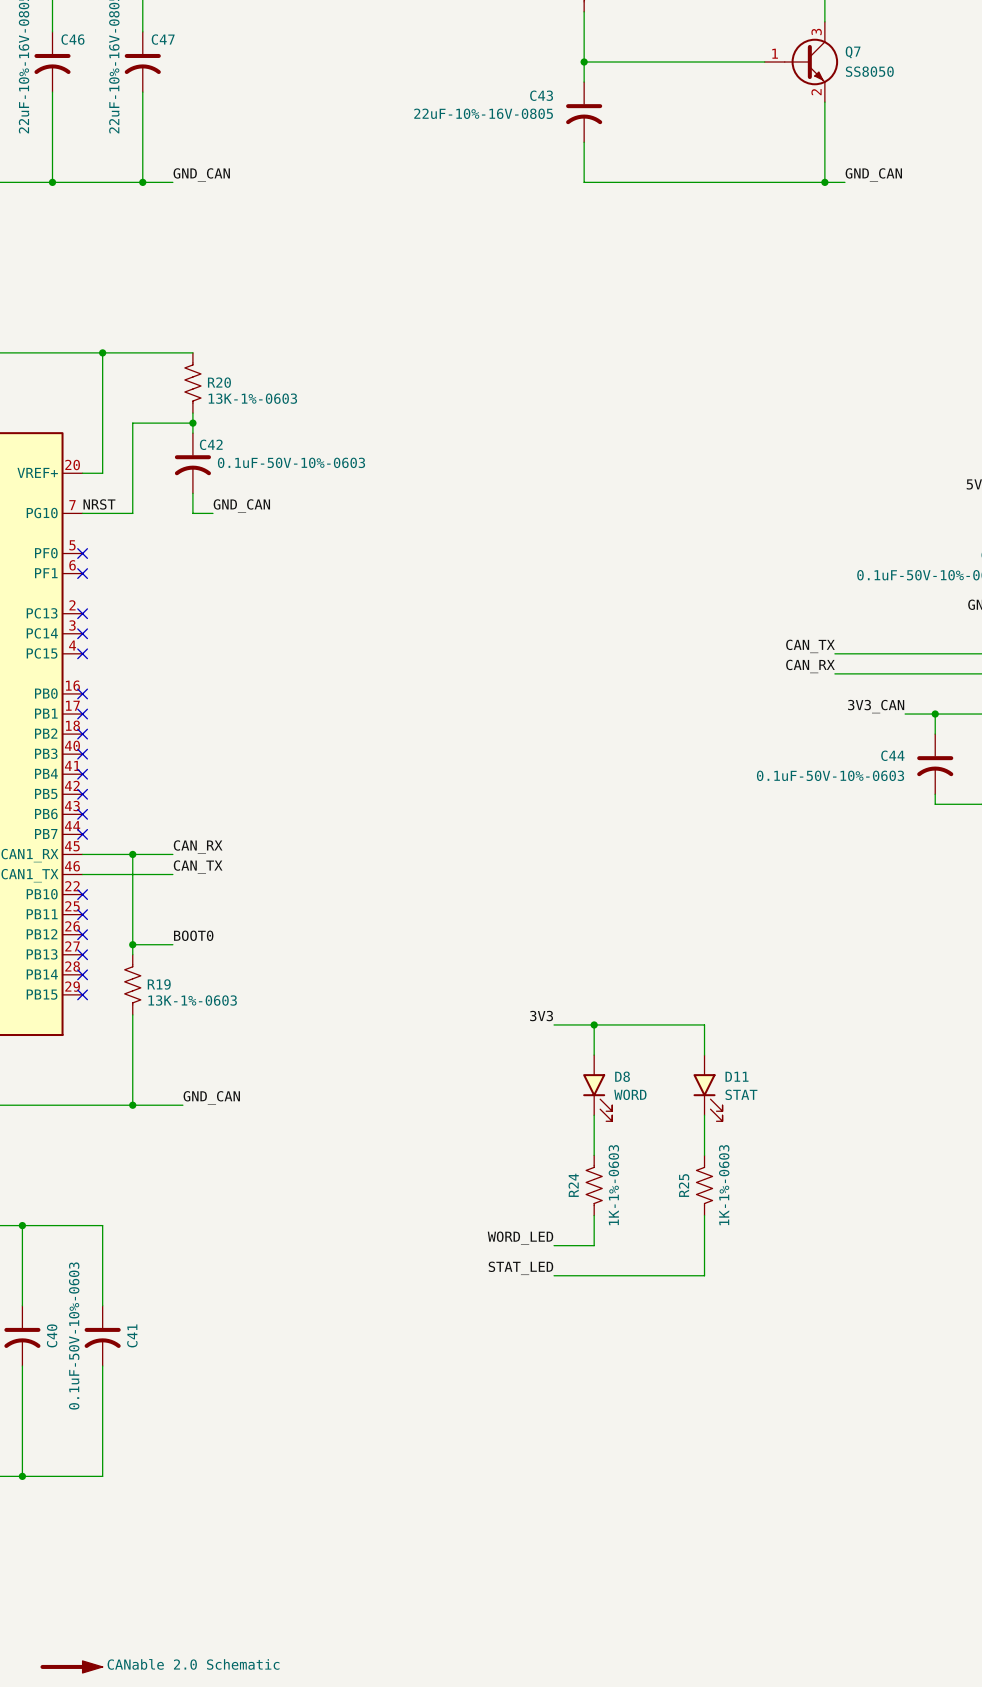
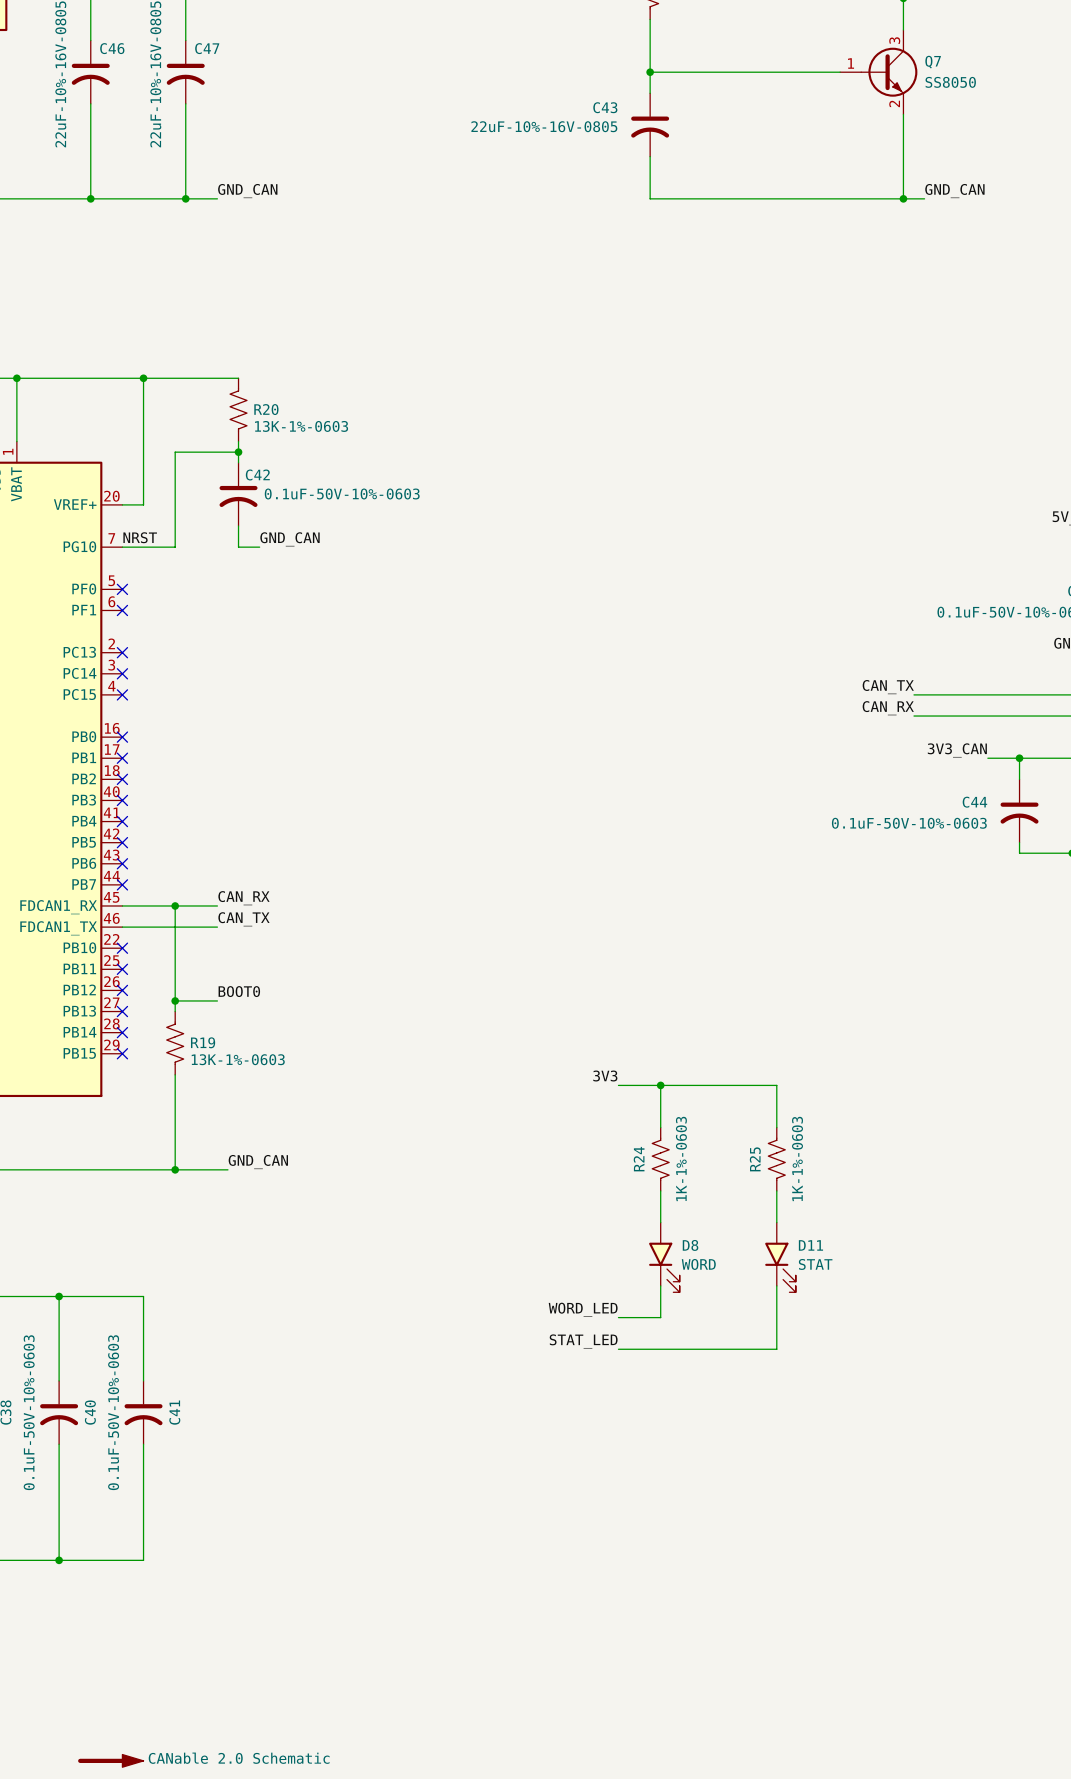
D8 position: (597, 1088) -> (664, 1257)
D11 position: (708, 1088) -> (780, 1257)
R24 position: (594, 1185) -> (660, 1159)
R25 position: (704, 1185) -> (776, 1159)

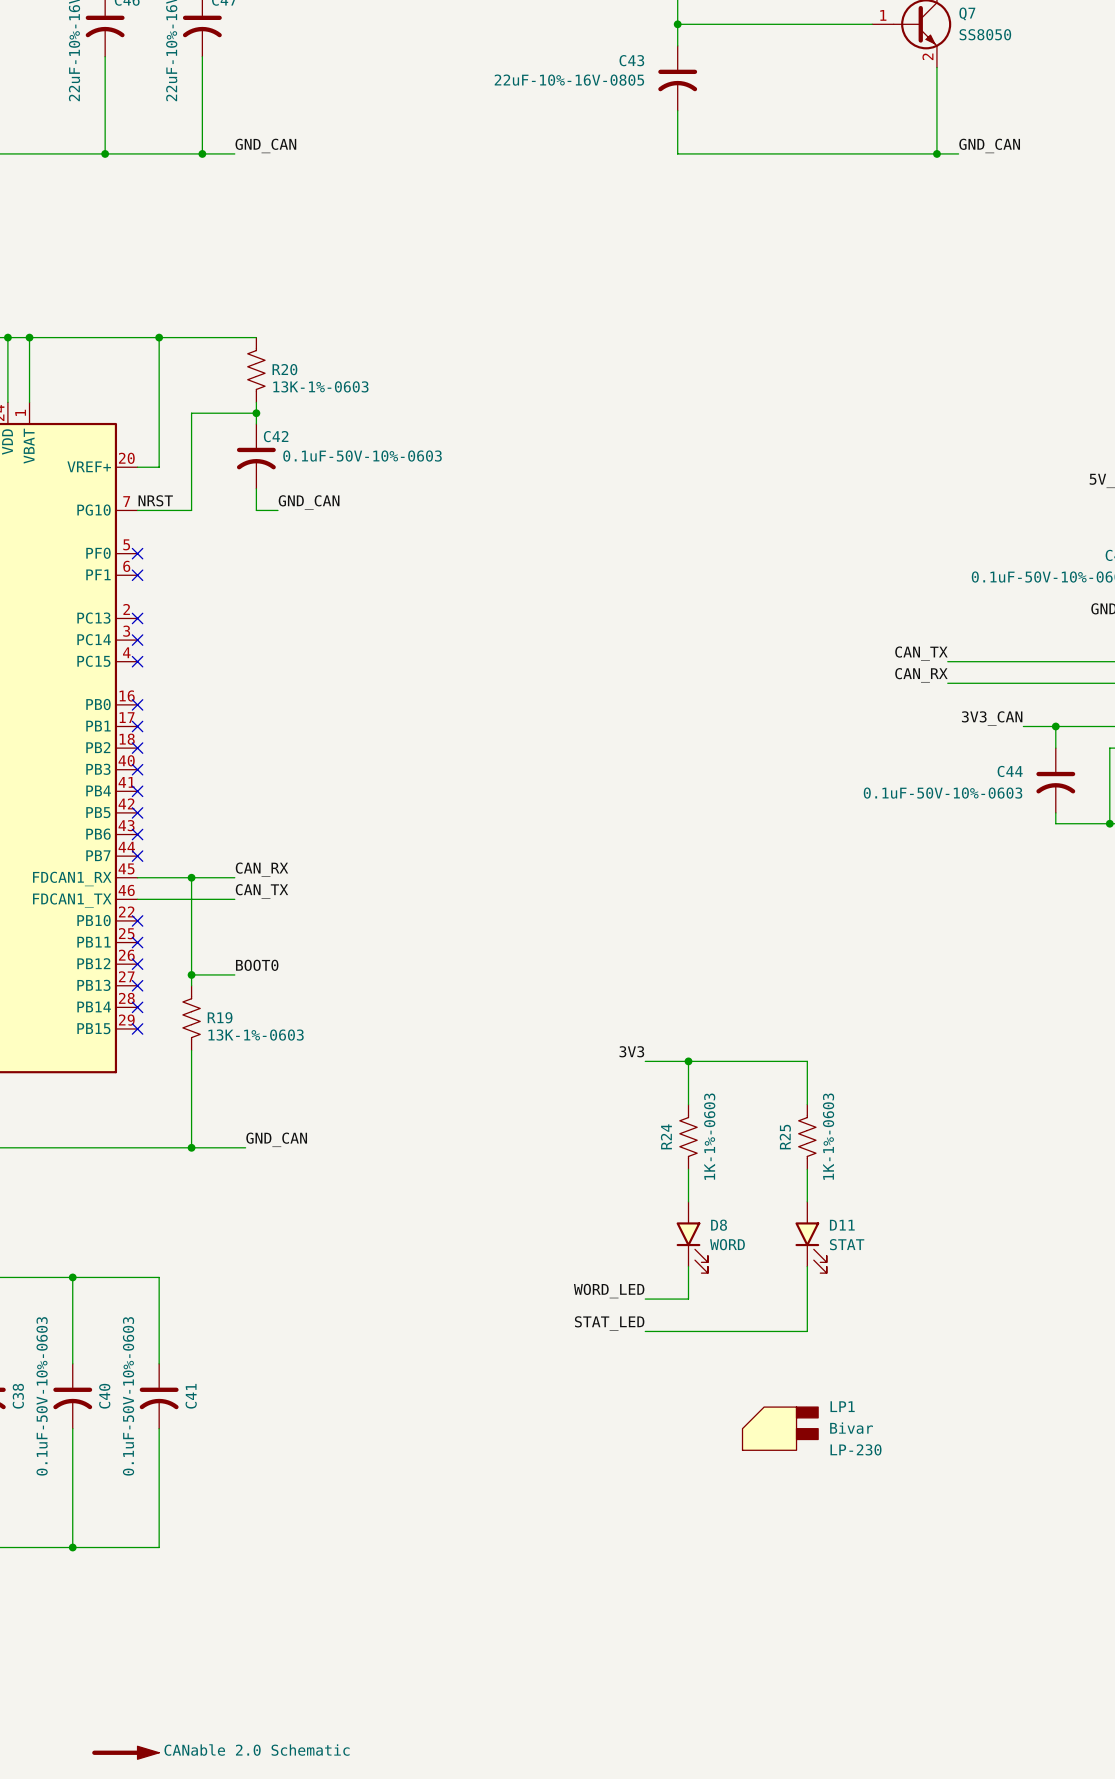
LP1: none -> (780, 1428)

